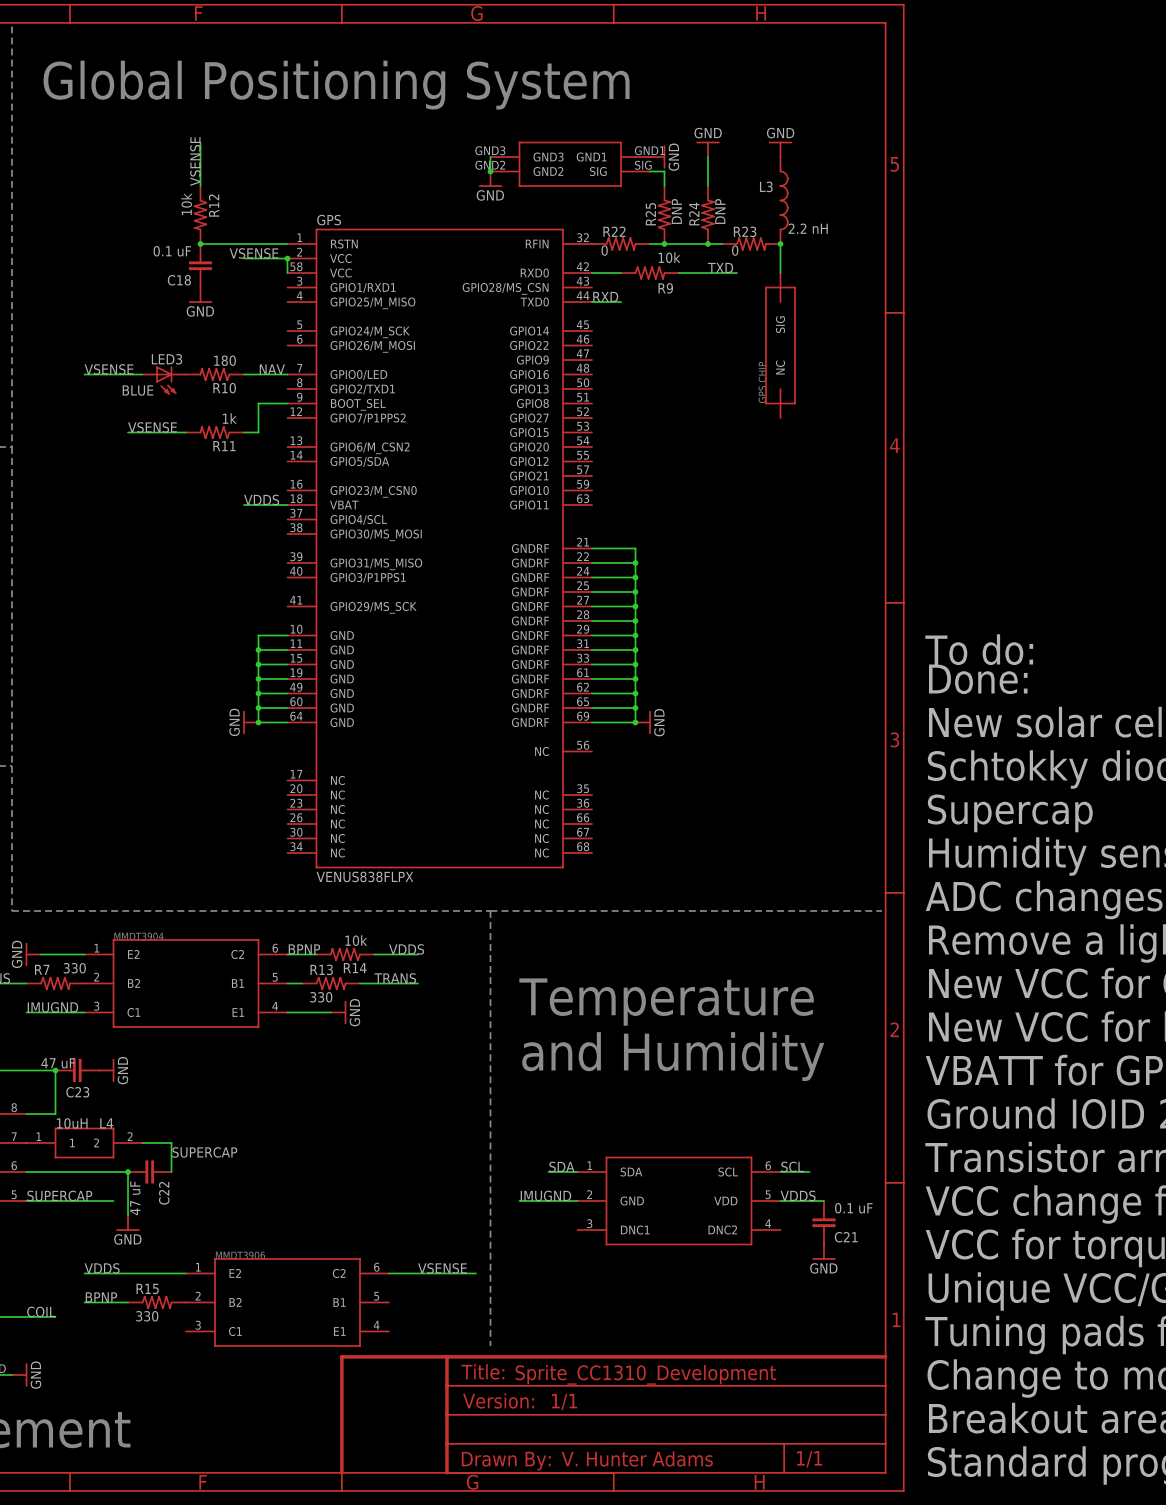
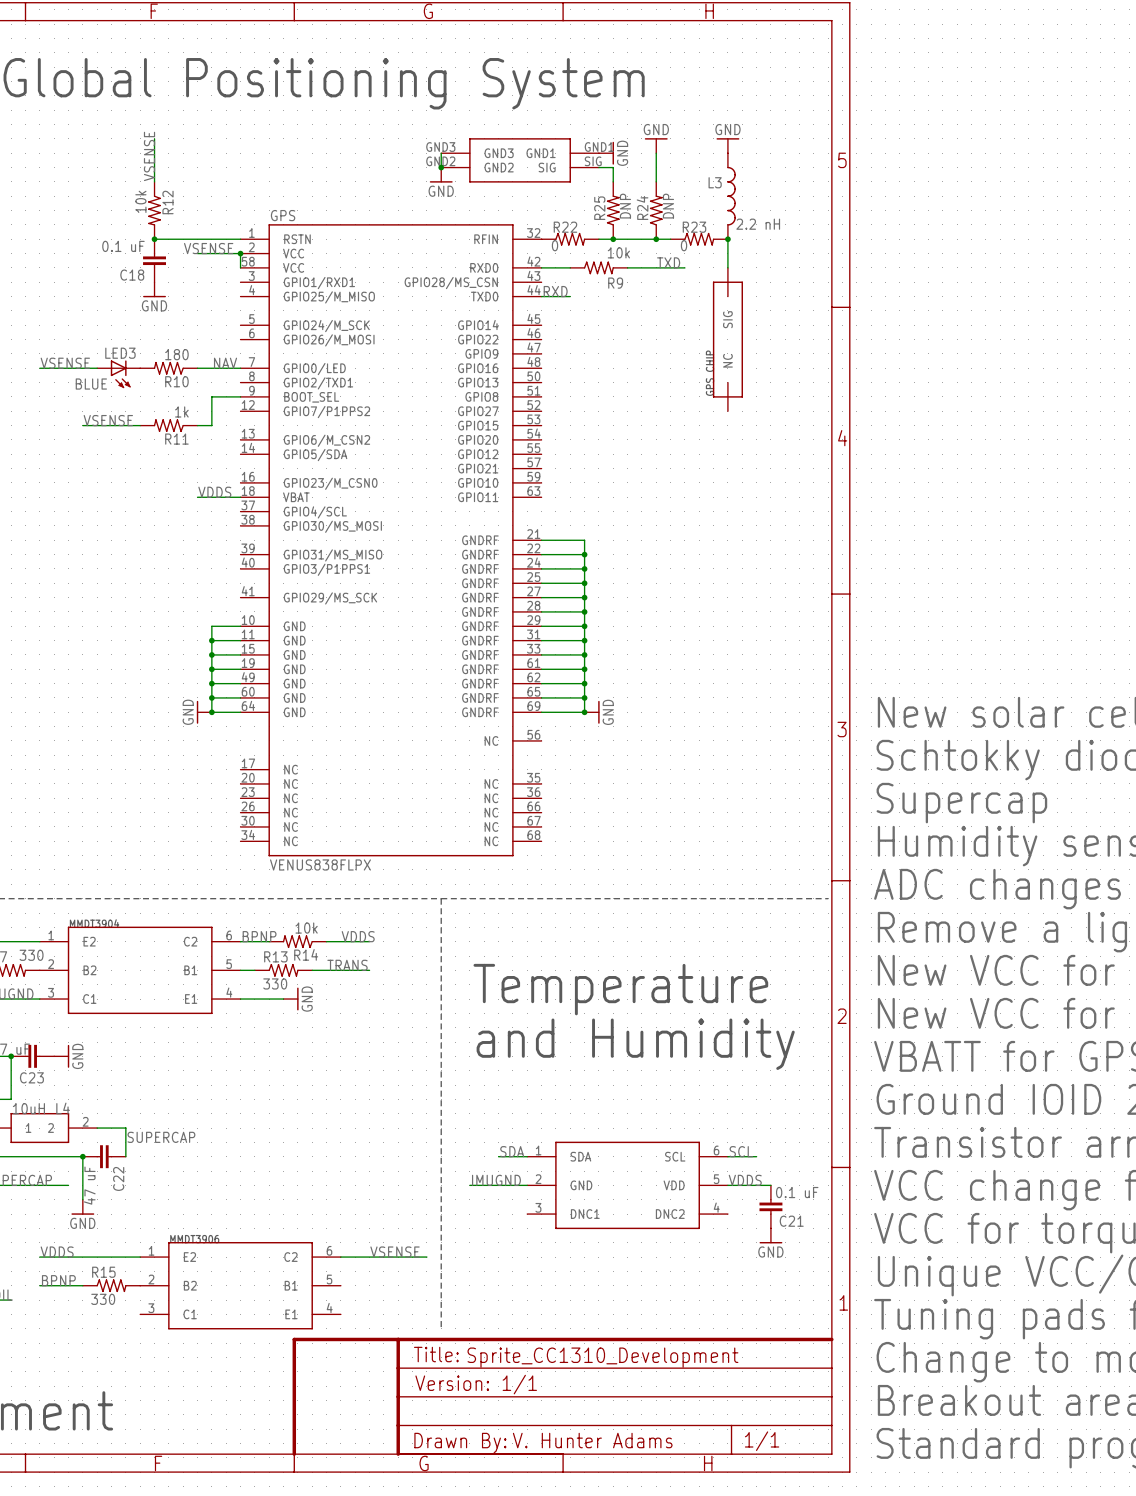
text: To do: (979, 649) -> none
text: Done: (978, 679) -> none

